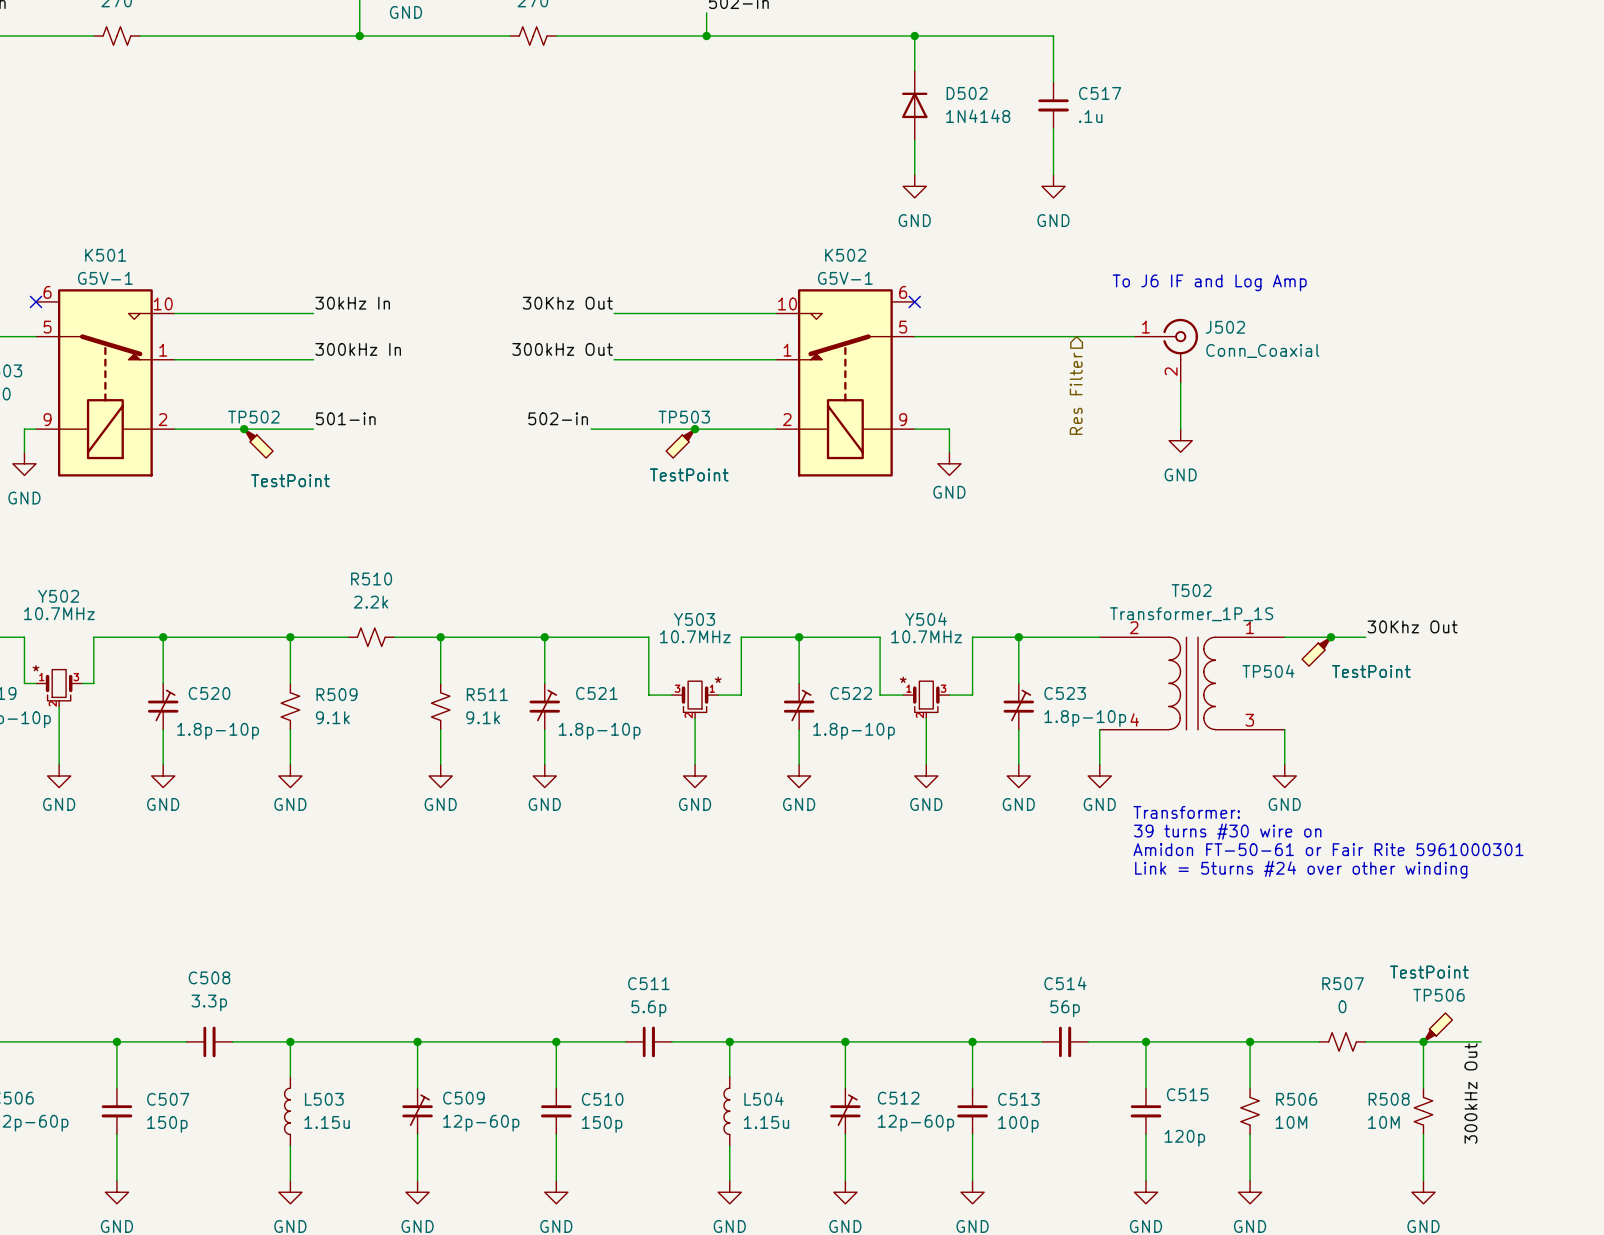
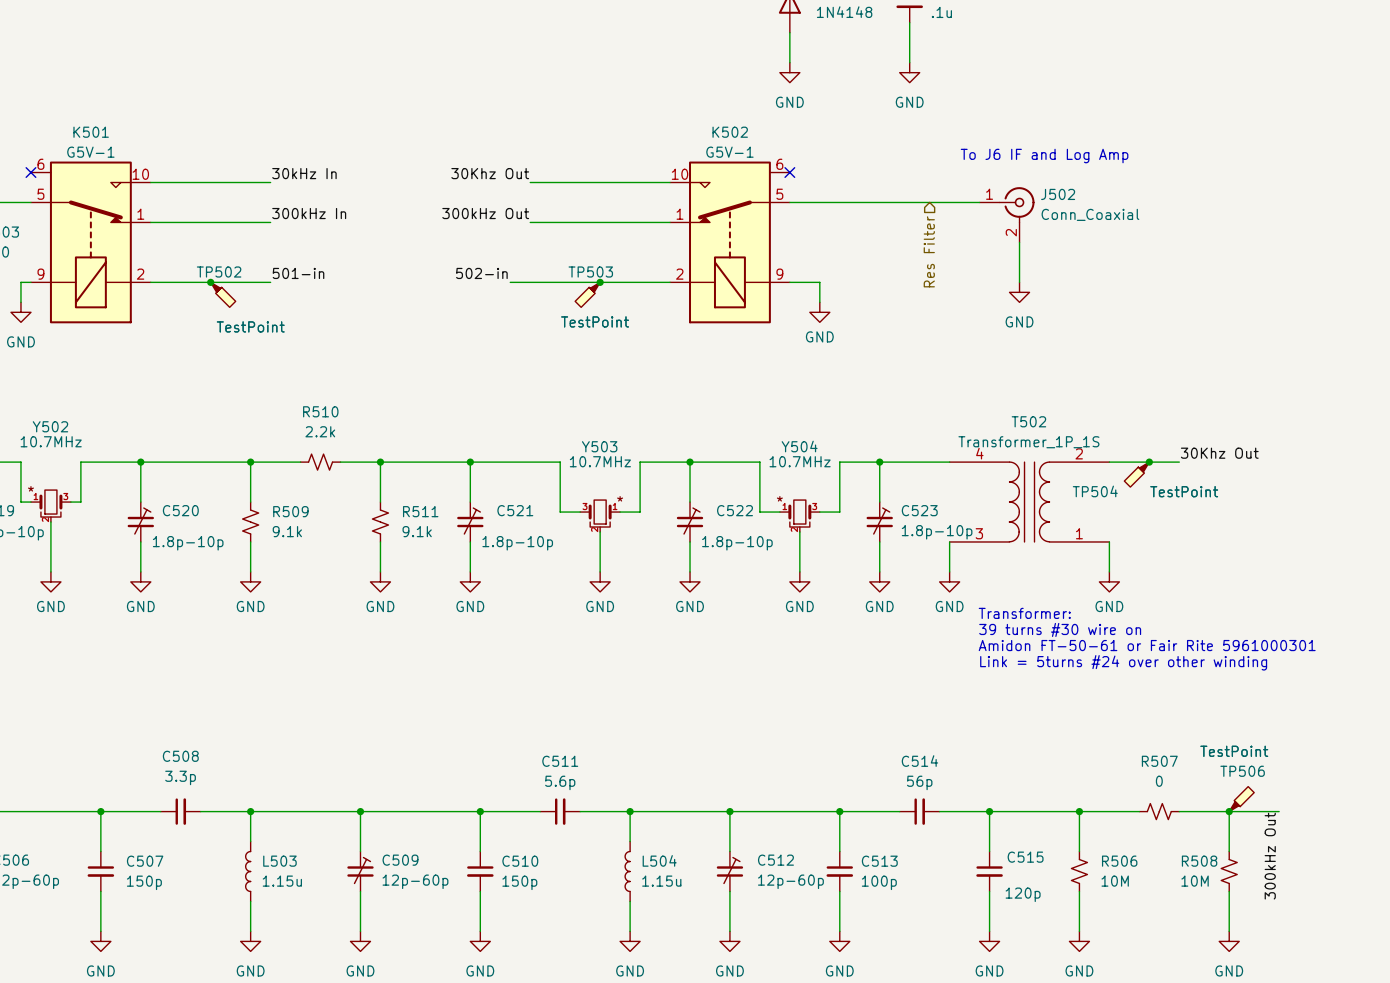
T502 pin number: 2 (1134, 627) -> 4 (979, 453)
T502 pin number: 1 (1250, 627) -> 2 (1079, 453)
T502 pin number: 4 (1134, 719) -> 3 (979, 533)
T502 pin number: 3 (1249, 720) -> 1 (1079, 533)

